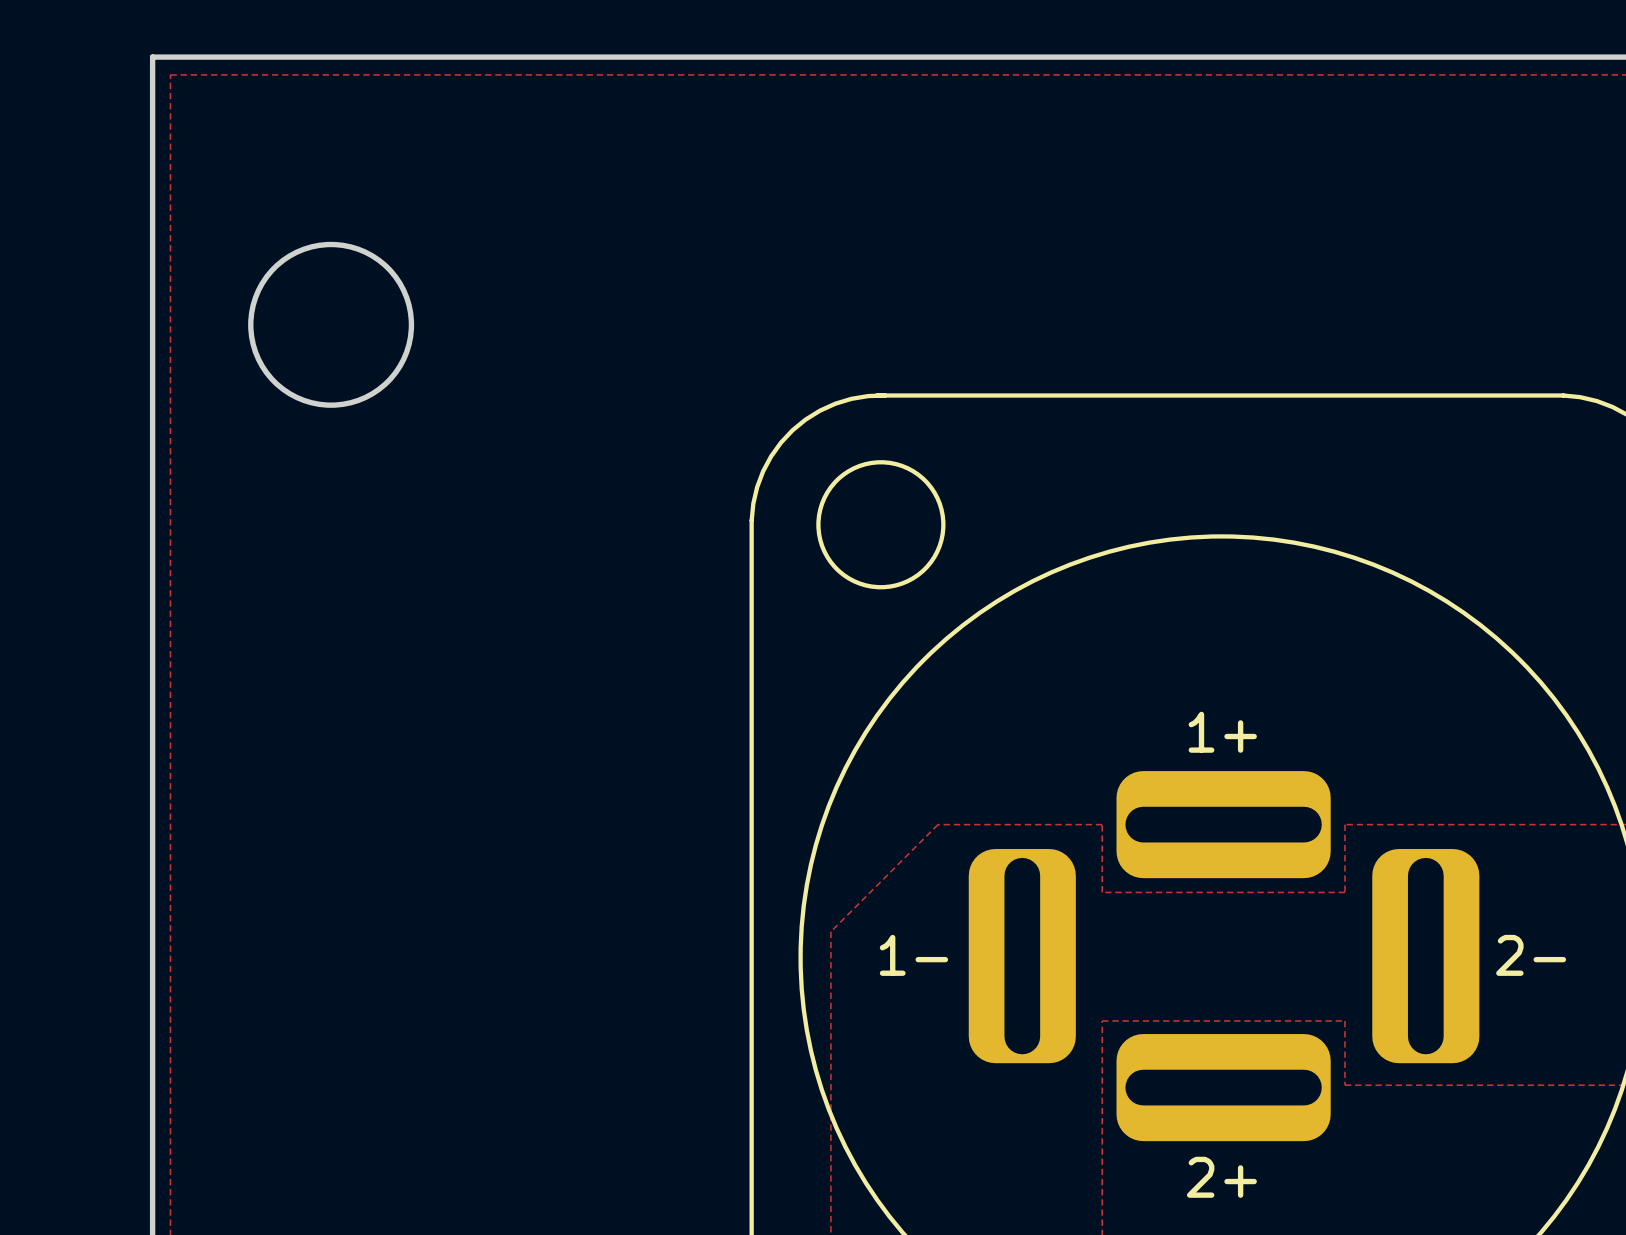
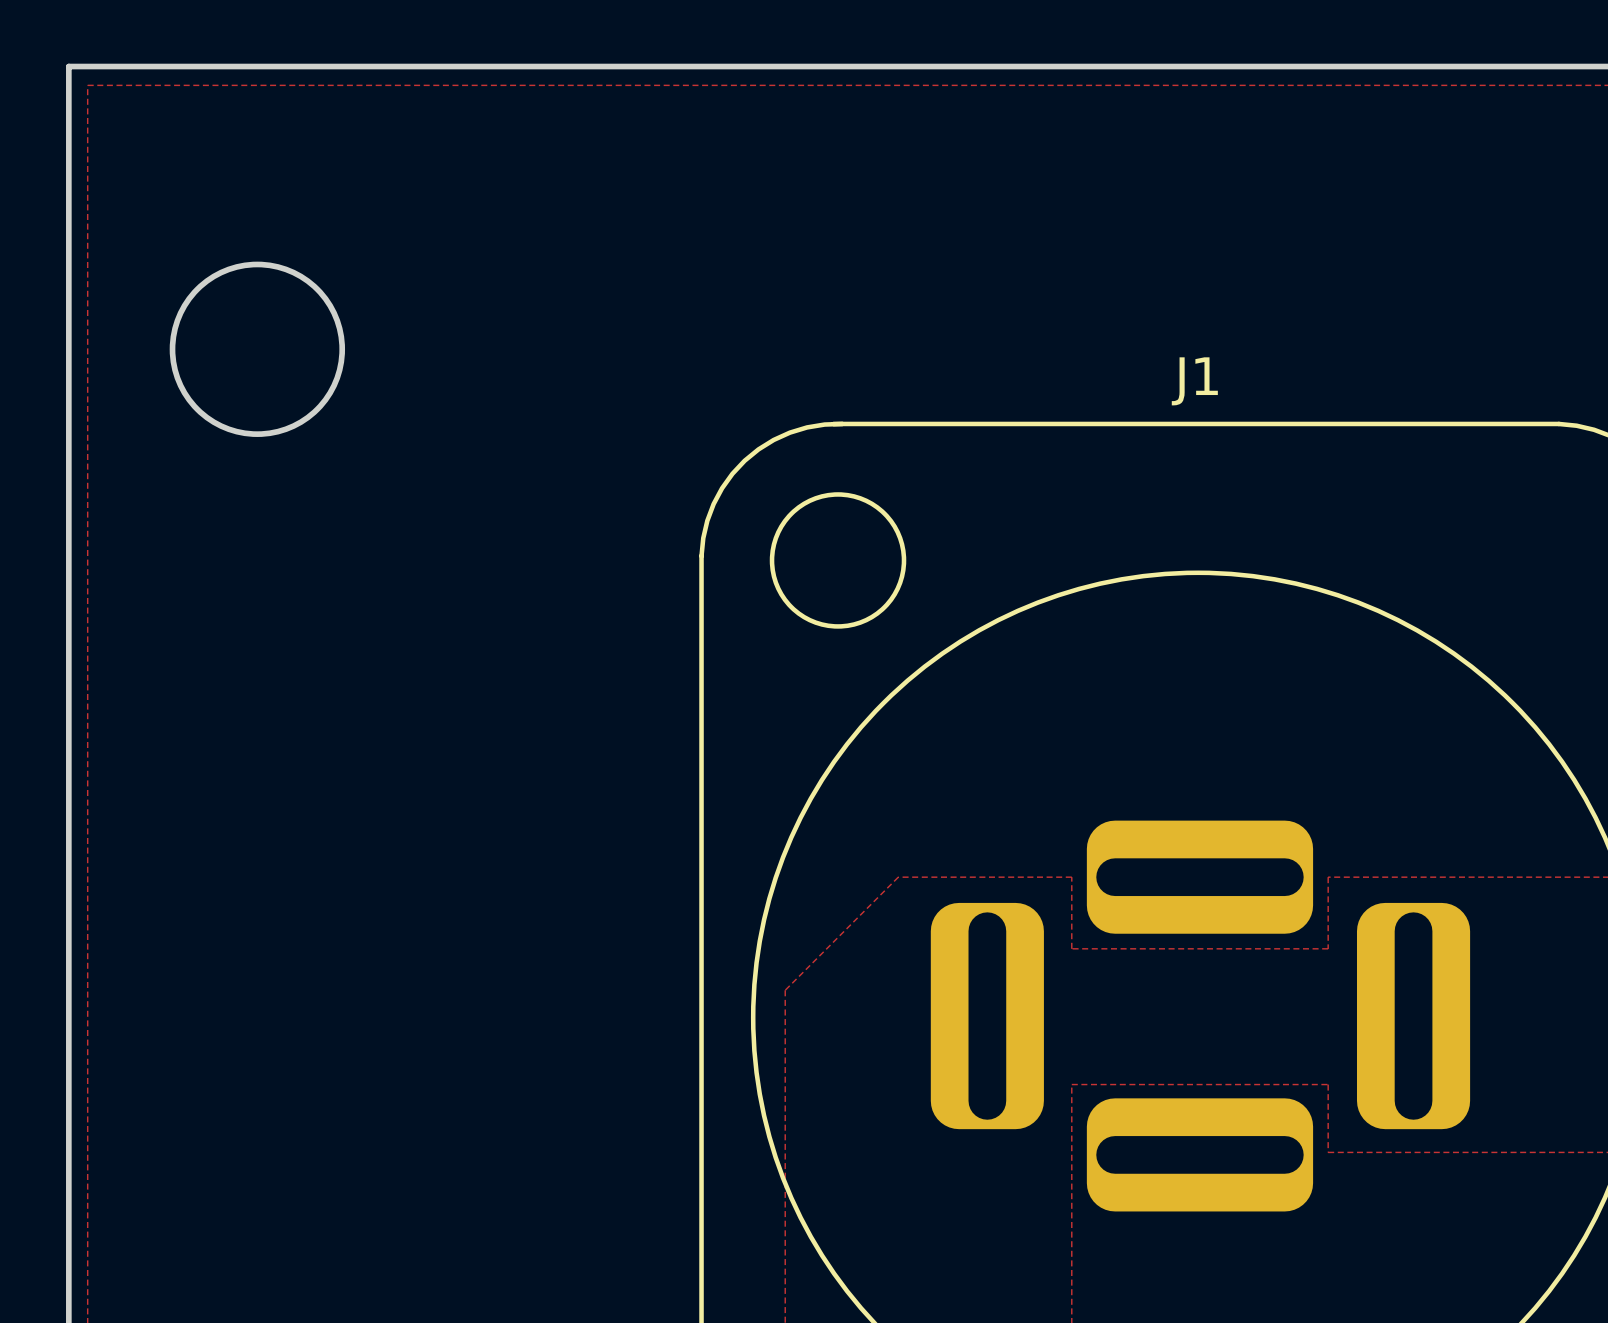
J1 name: none -> J1 (1194, 381)
text: 1+ (1222, 732) -> none
text: 1- (913, 955) -> none
text: 2- (1531, 955) -> none
text: 2+ (1221, 1177) -> none

